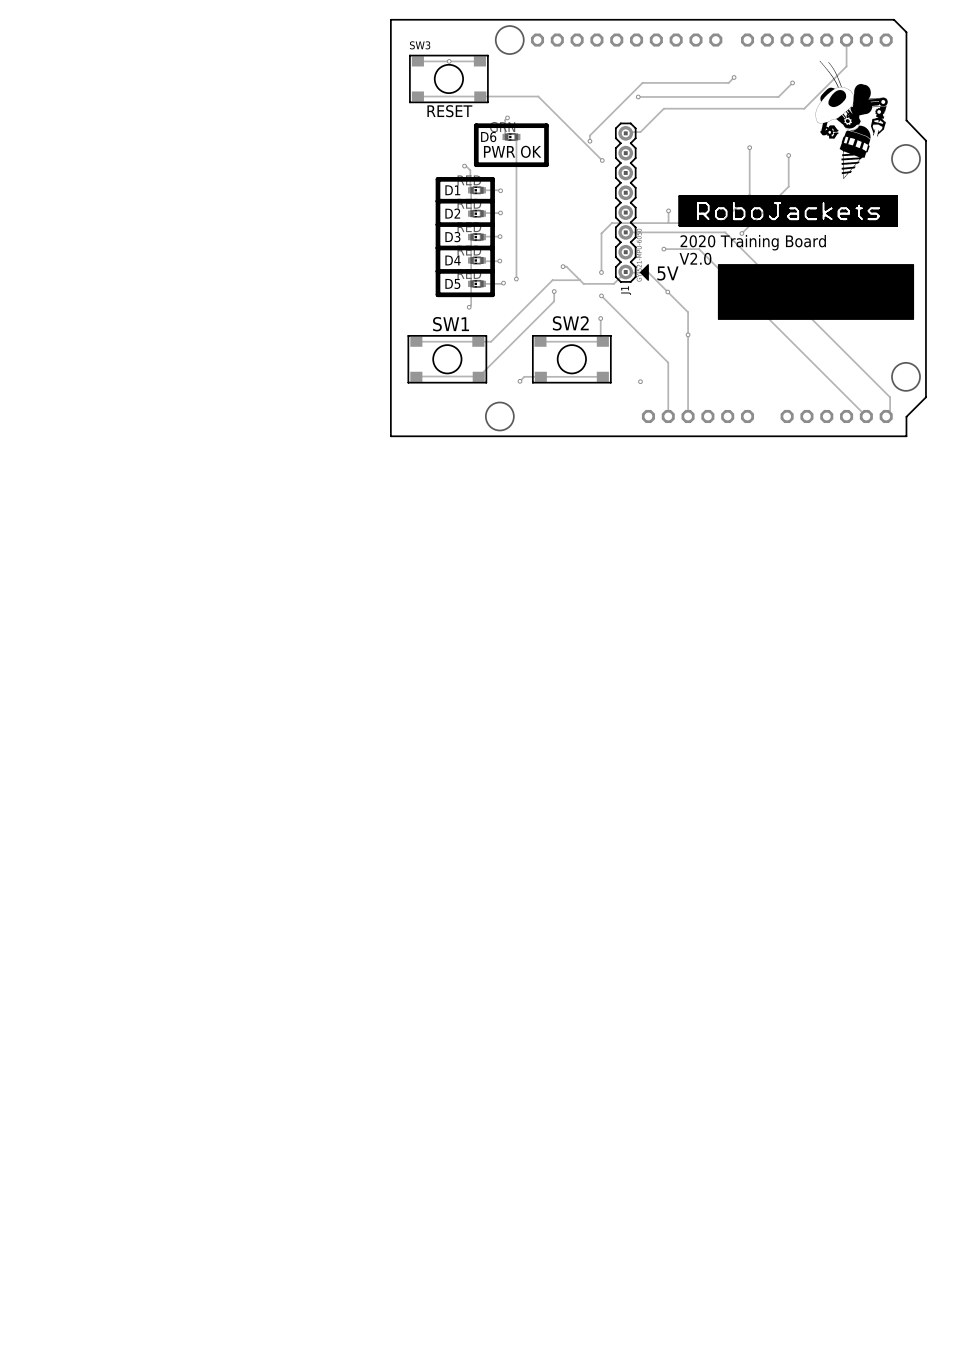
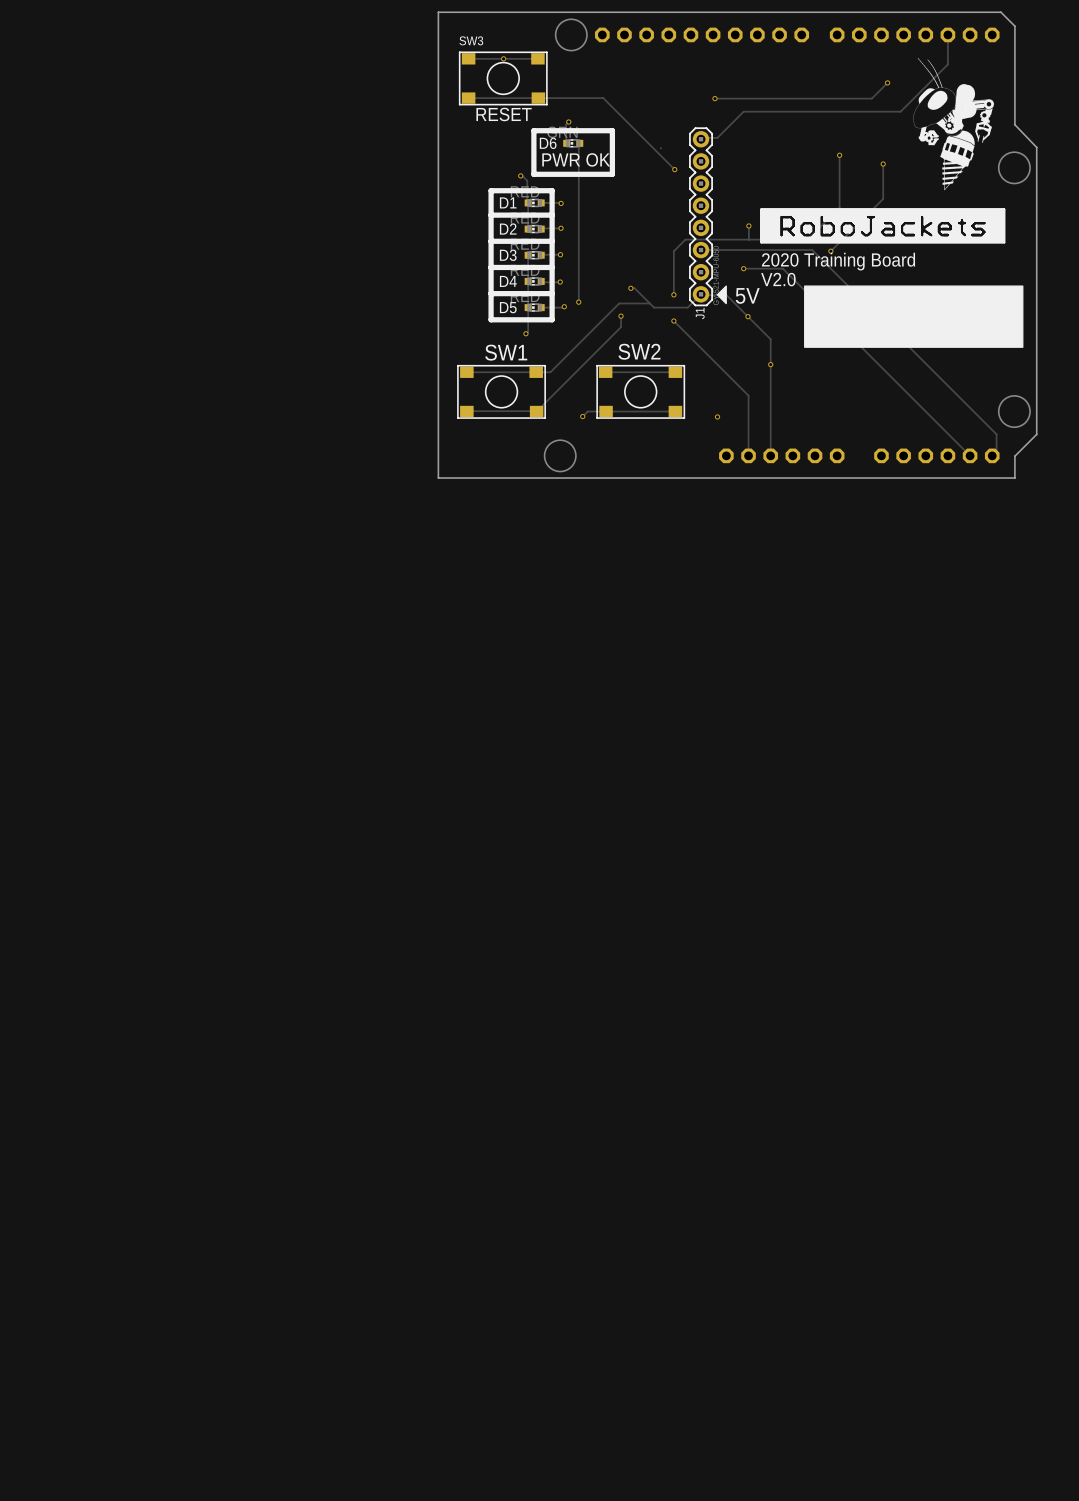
track: (734, 77) (728, 82) (642, 82) (589, 135) (589, 141) -> none
via: (734, 77) -> none
via: (589, 141) -> none
track: (600, 318) (600, 339) (602, 341) -> none
via: (600, 318) -> none

